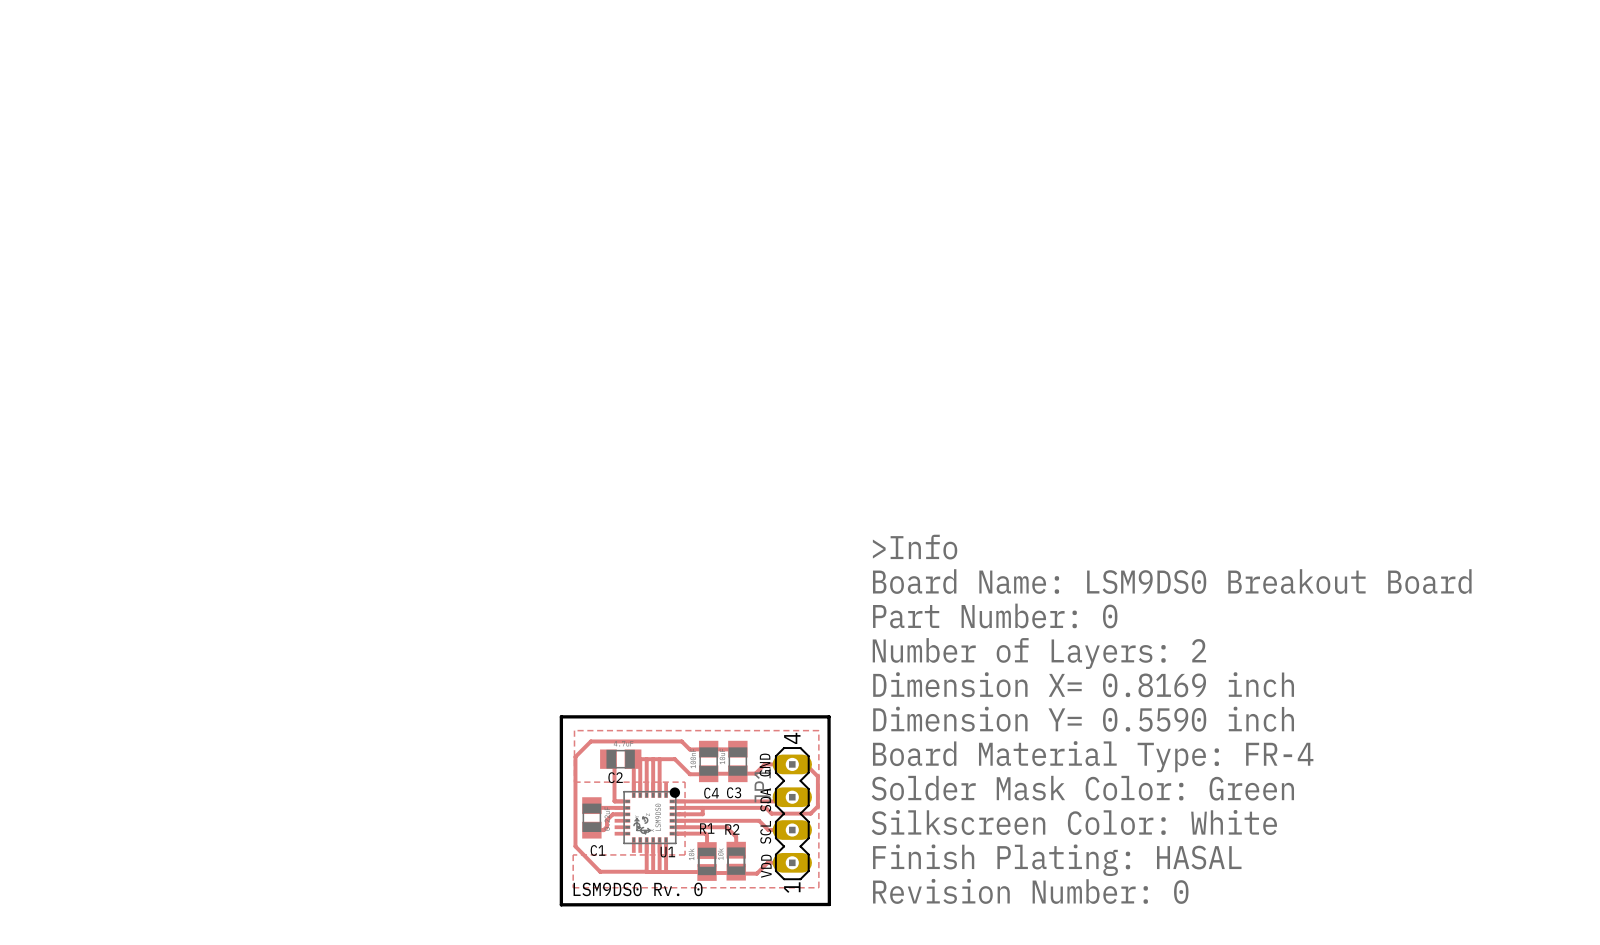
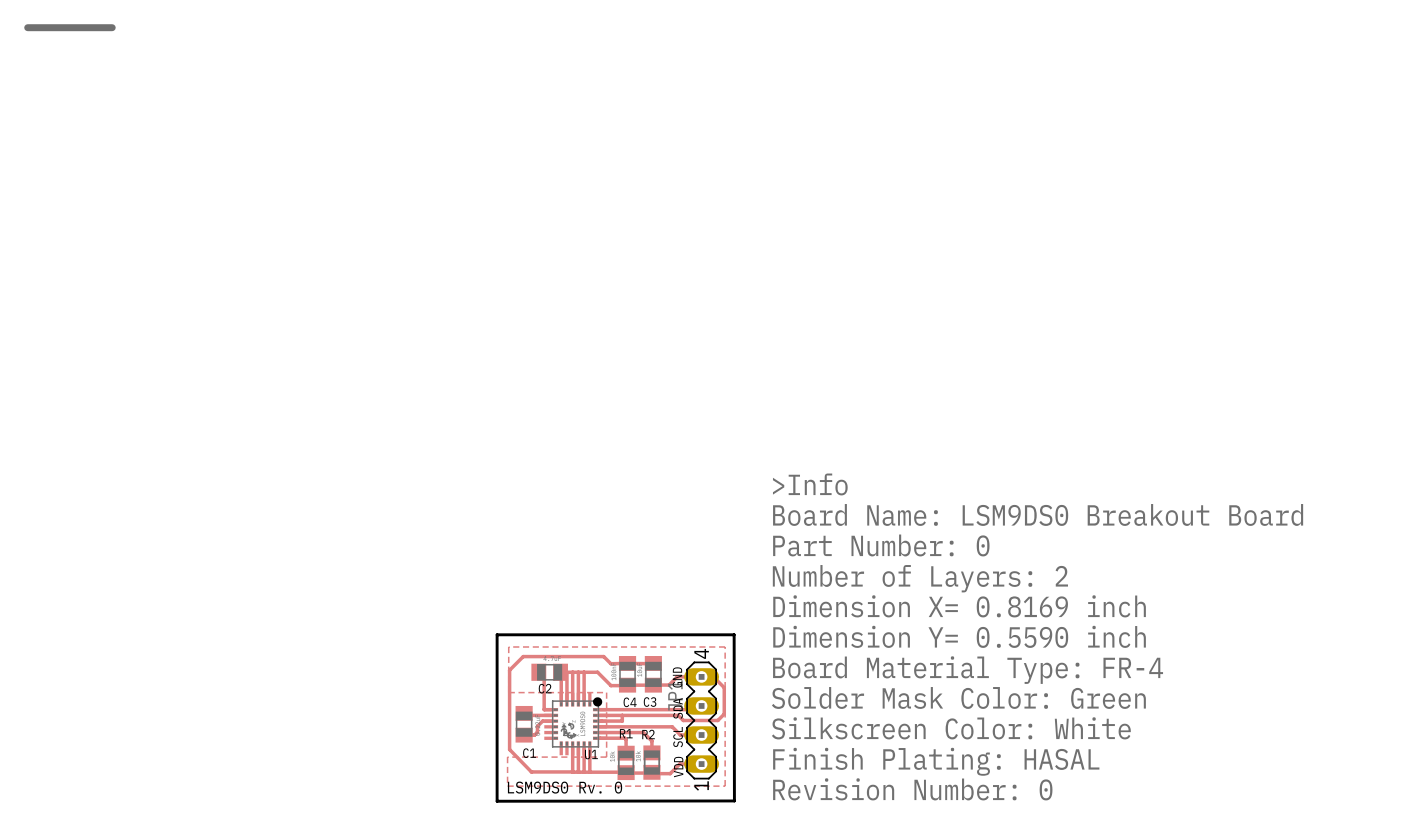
line: none -> (27, 27) (112, 27)

